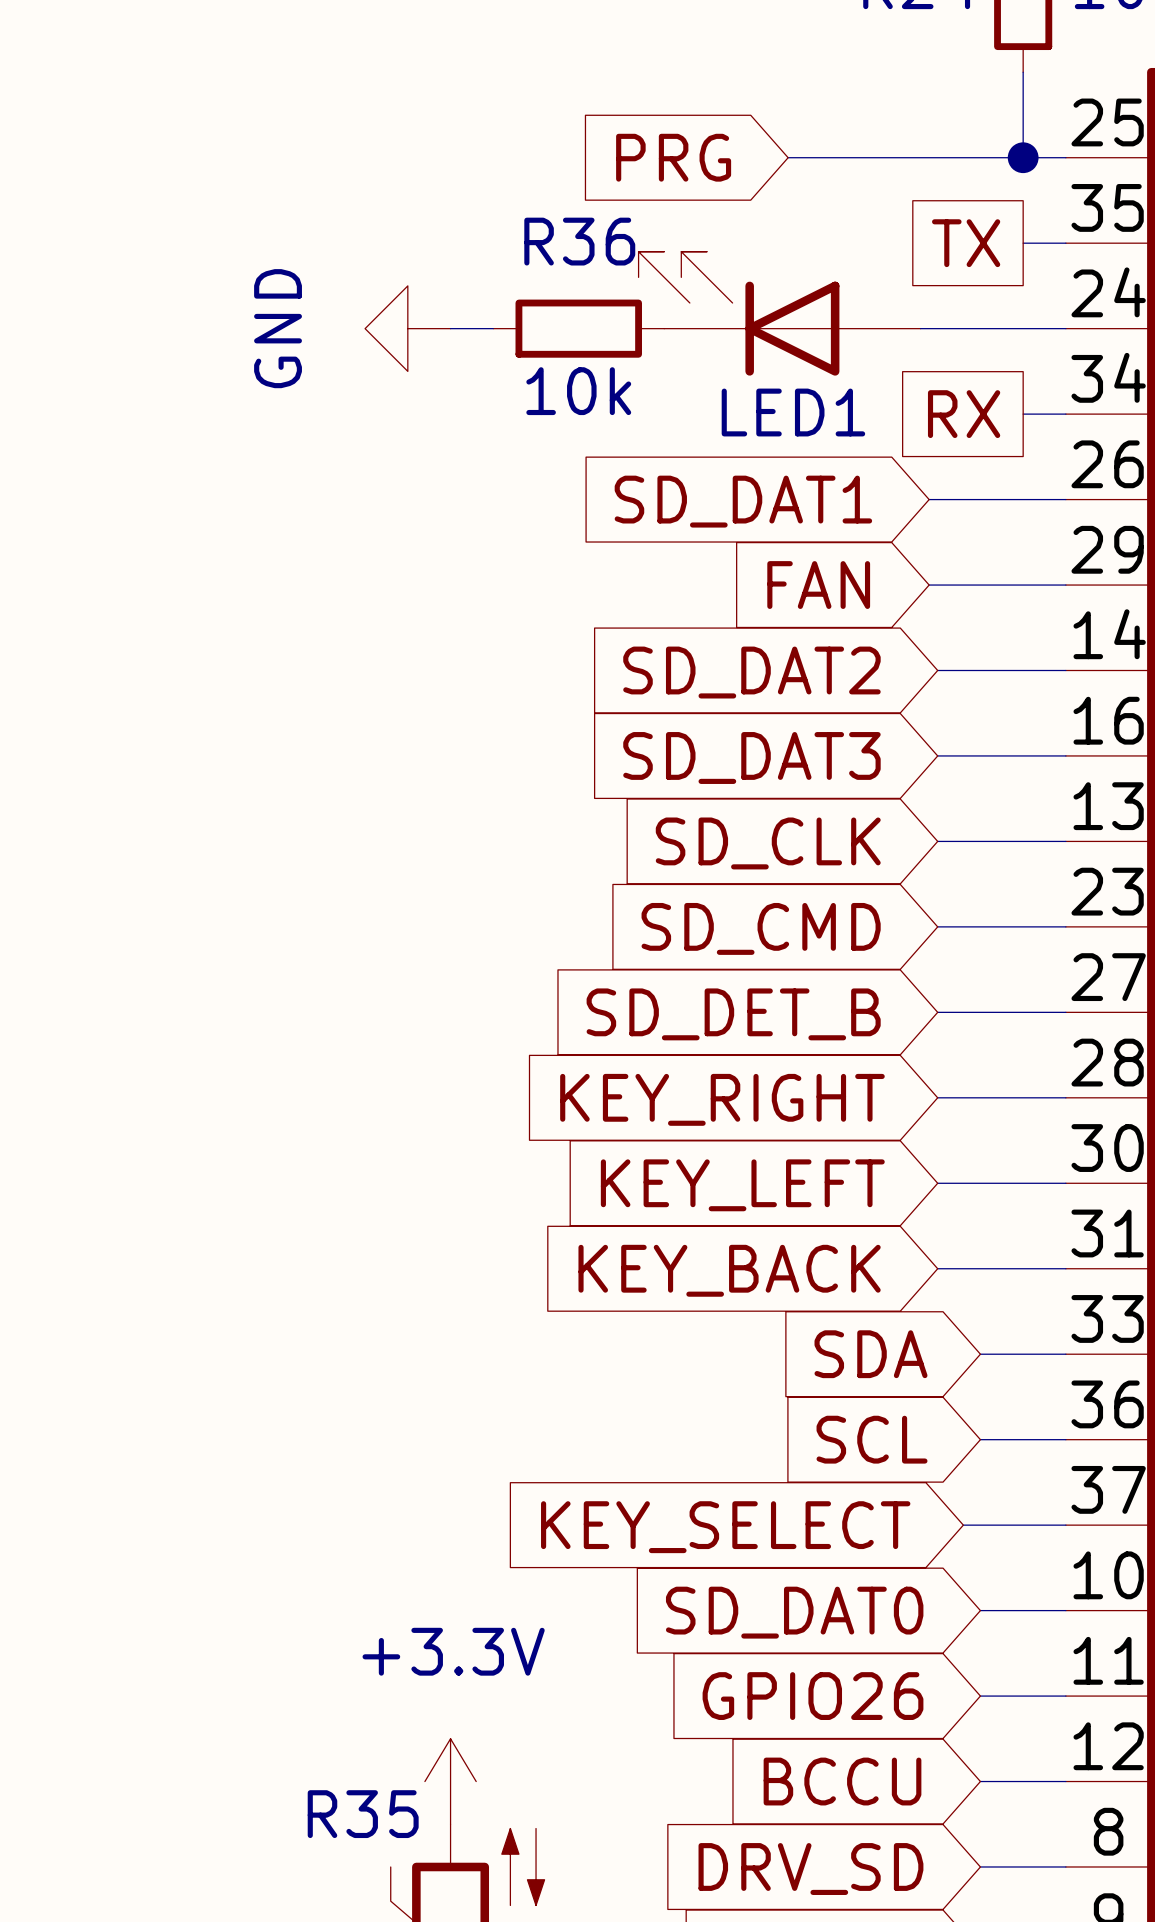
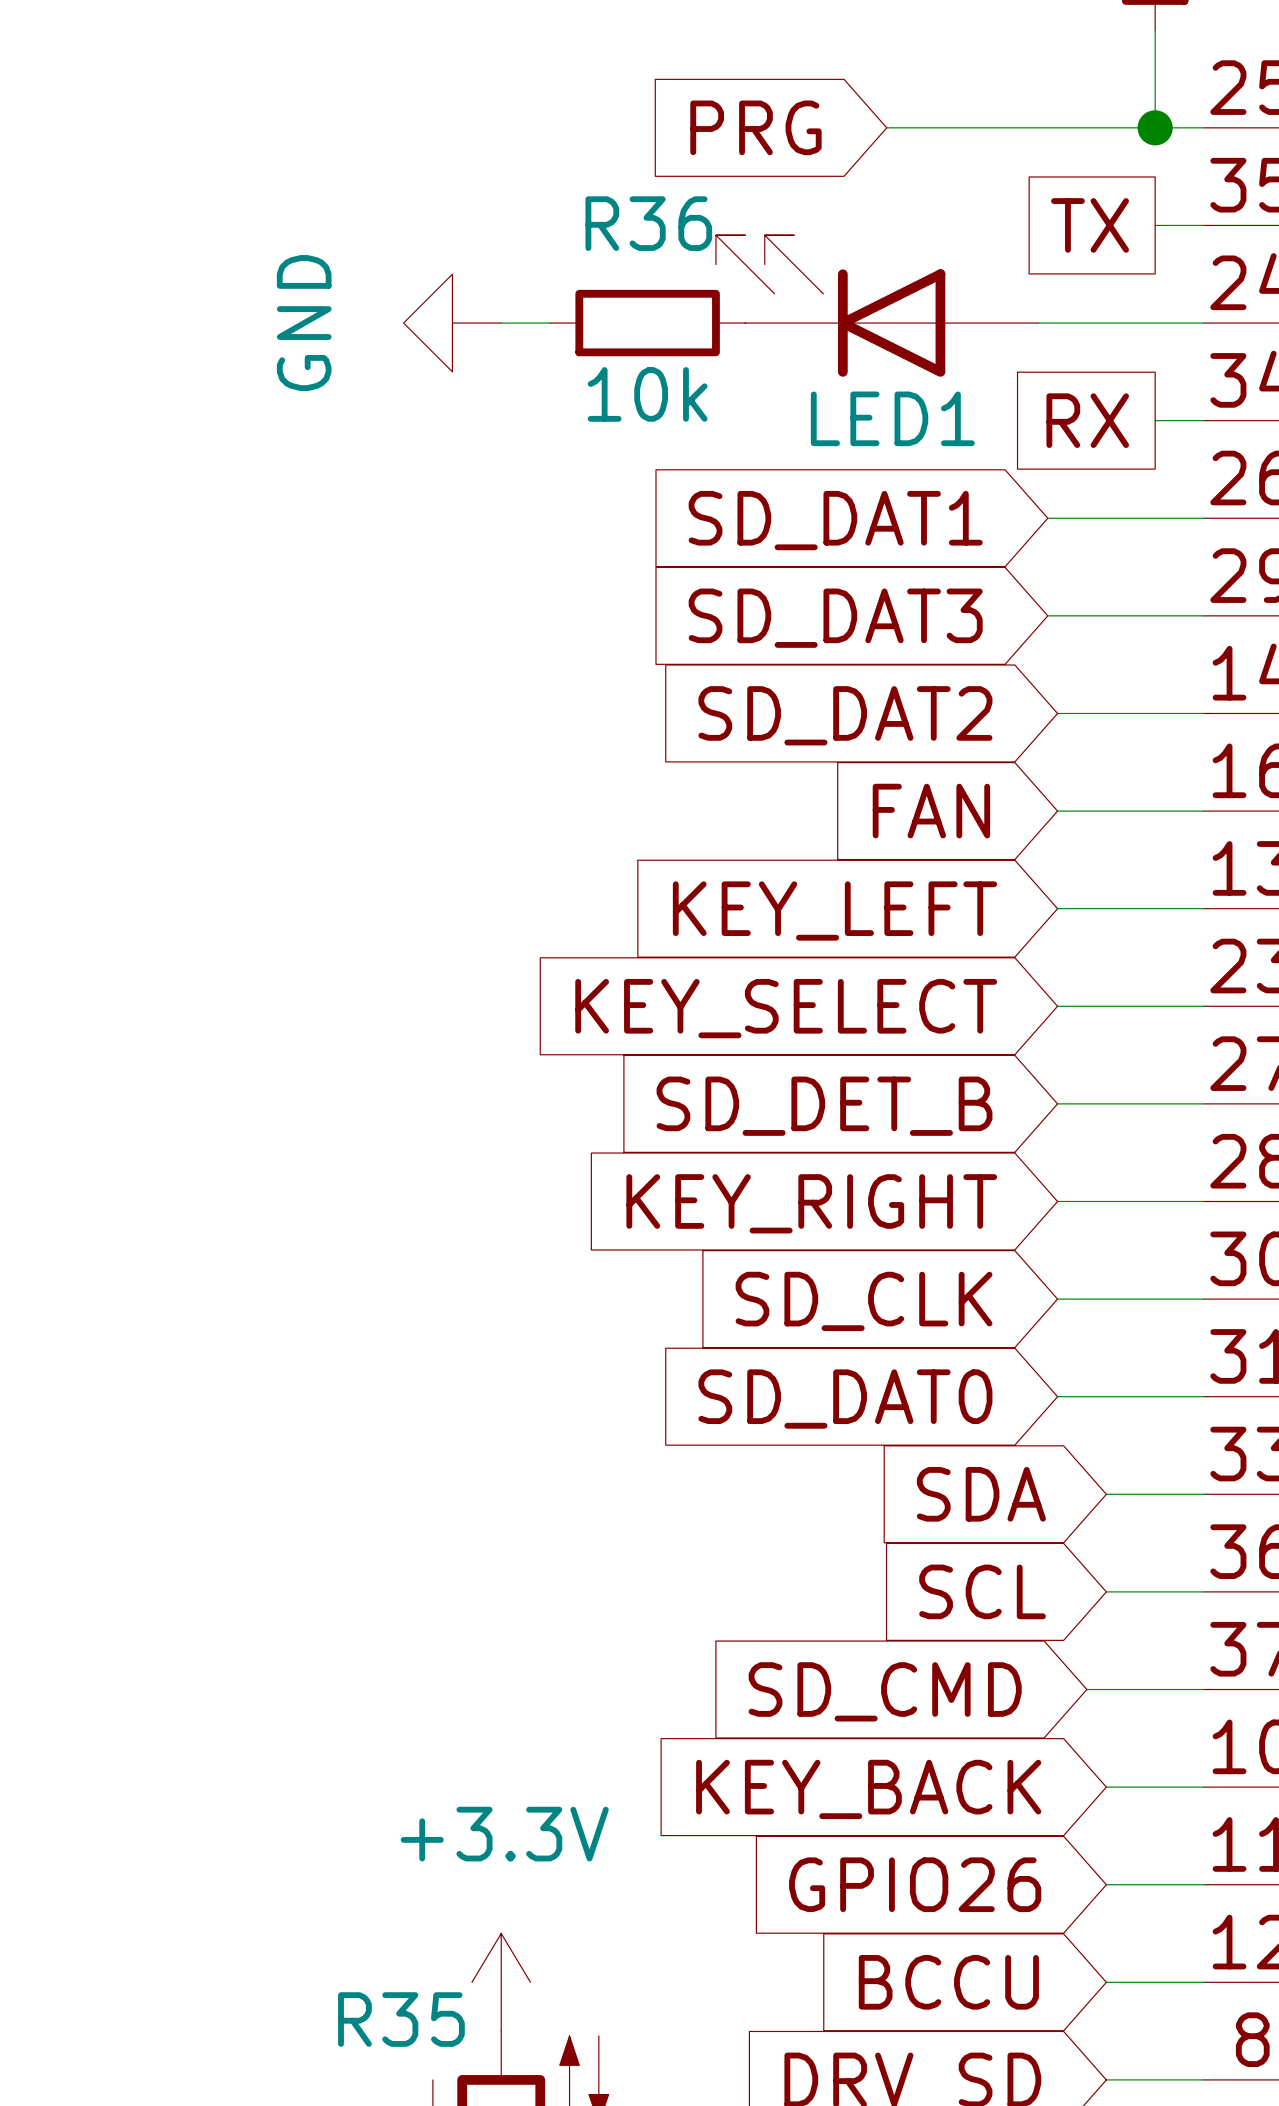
global label: FAN (818, 585) -> SD_DAT3 (835, 618)
global label: SD_DAT3 (751, 757) -> FAN (931, 811)
global label: SD_CLK (768, 843) -> KEY_LEFT (834, 911)
global label: SD_CMD (761, 928) -> KEY_SELECT (786, 1008)
global label: KEY_LEFT (742, 1185) -> SD_CLK (864, 1301)
global label: KEY_BACK (729, 1270) -> SD_DAT0 (845, 1399)
global label: KEY_SELECT (725, 1527) -> SD_CMD (885, 1691)
global label: SD_DAT0 (794, 1612) -> KEY_BACK (868, 1789)

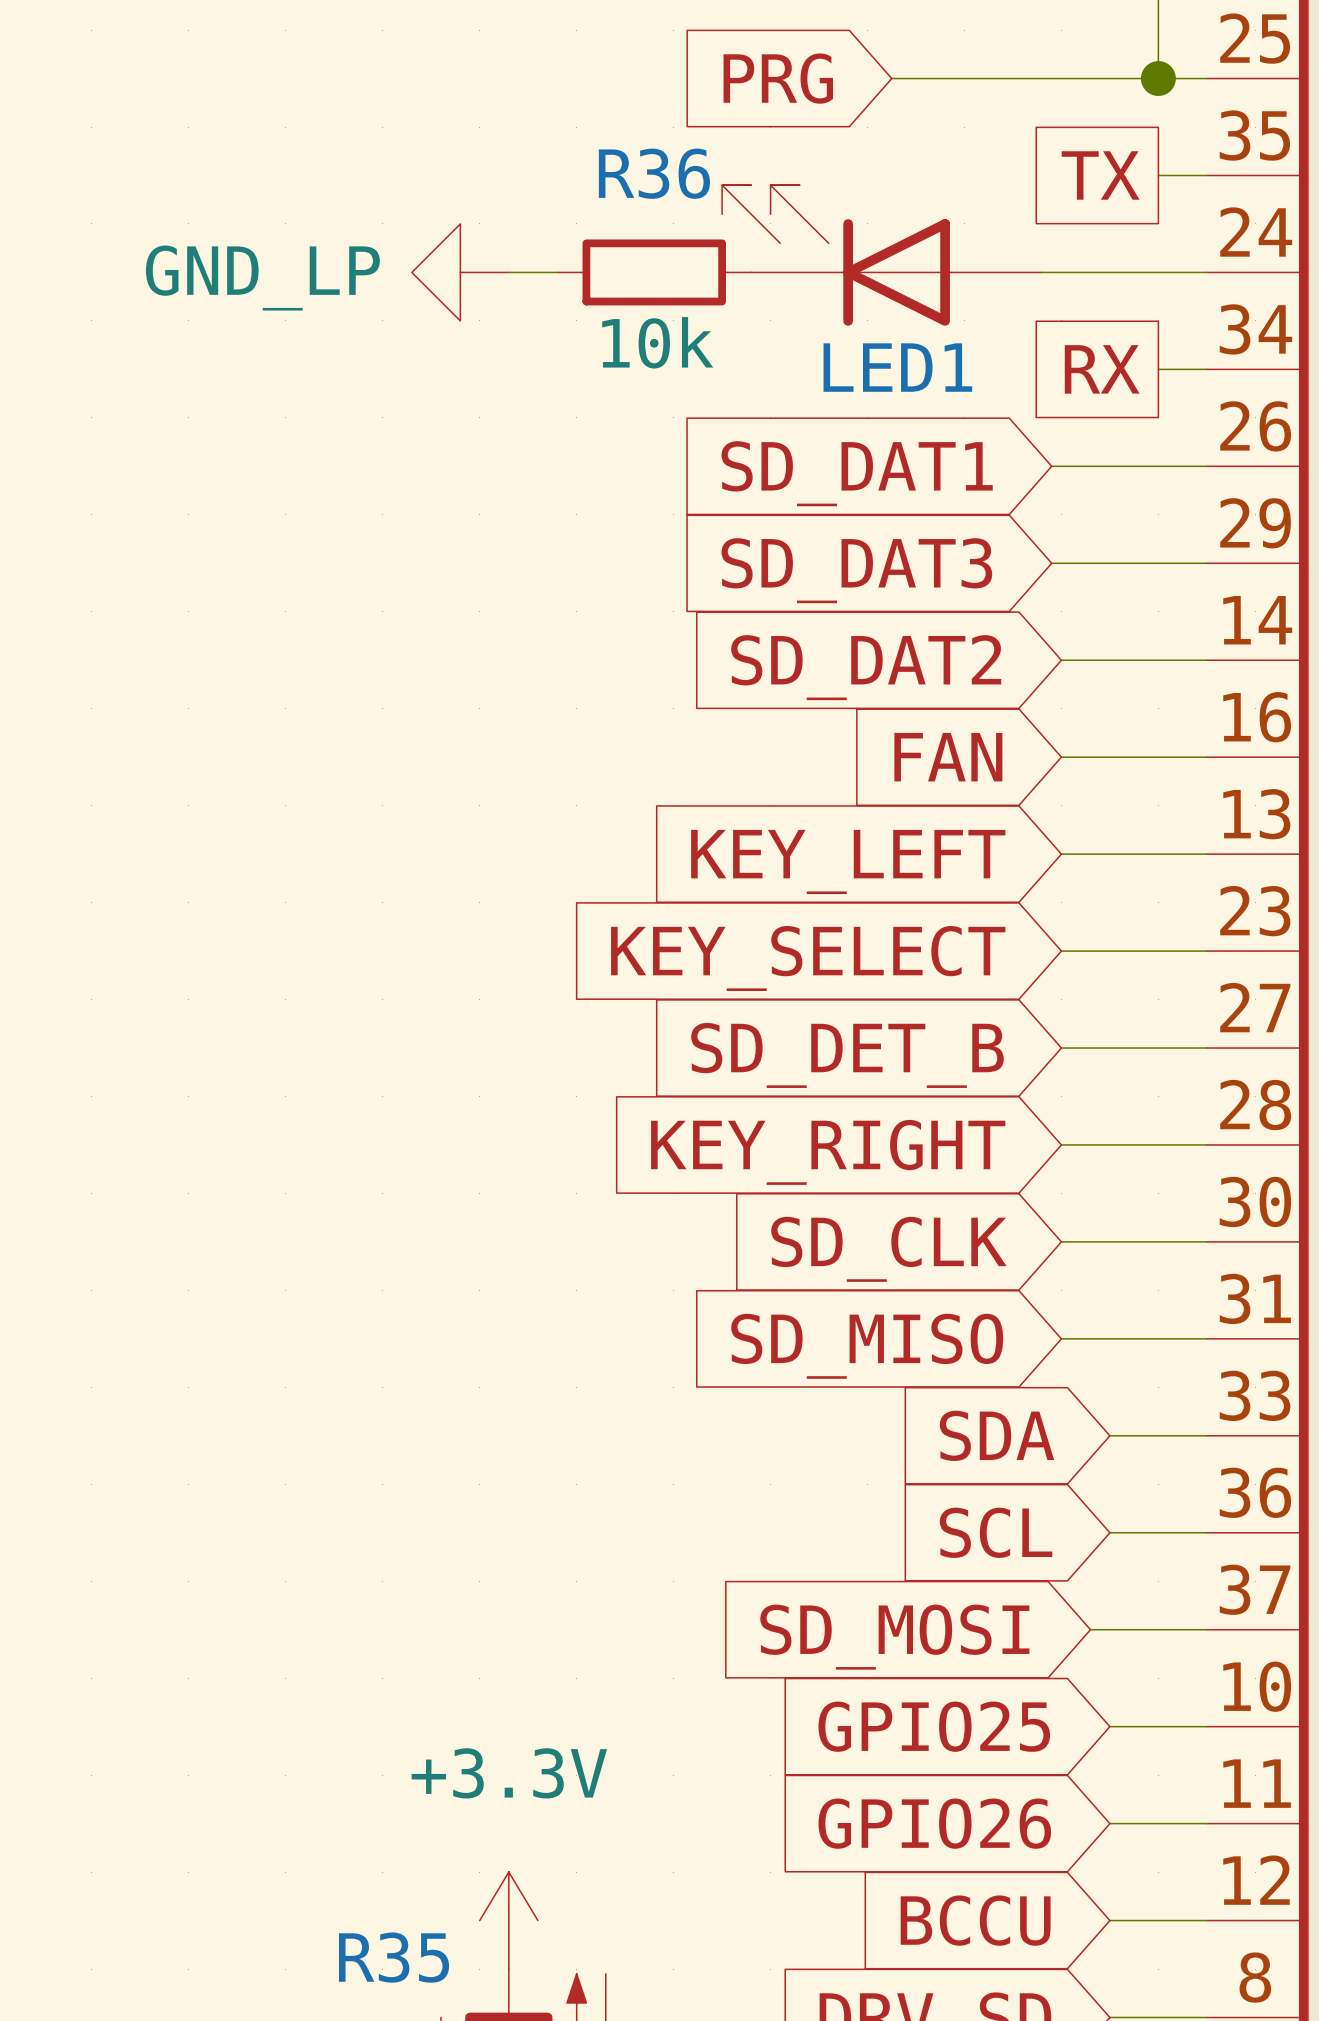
power symbol: GND (452, 323) -> GND_LP (460, 272)
global label: SD_DAT0 (845, 1399) -> SD_MISO (867, 1346)
global label: SD_CMD (885, 1691) -> SD_MOSI (894, 1637)
global label: KEY_BACK (868, 1789) -> GPIO25 (934, 1726)

